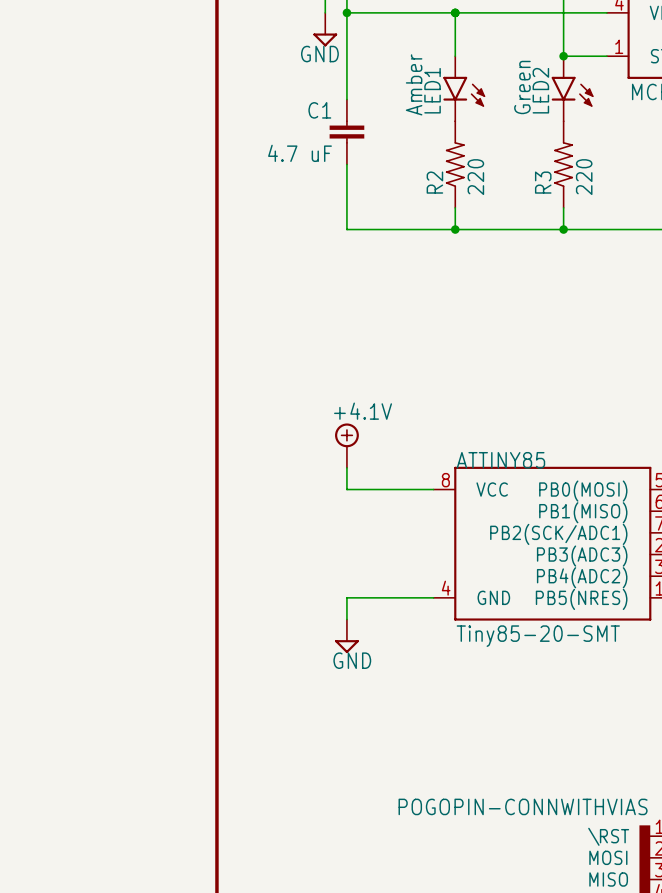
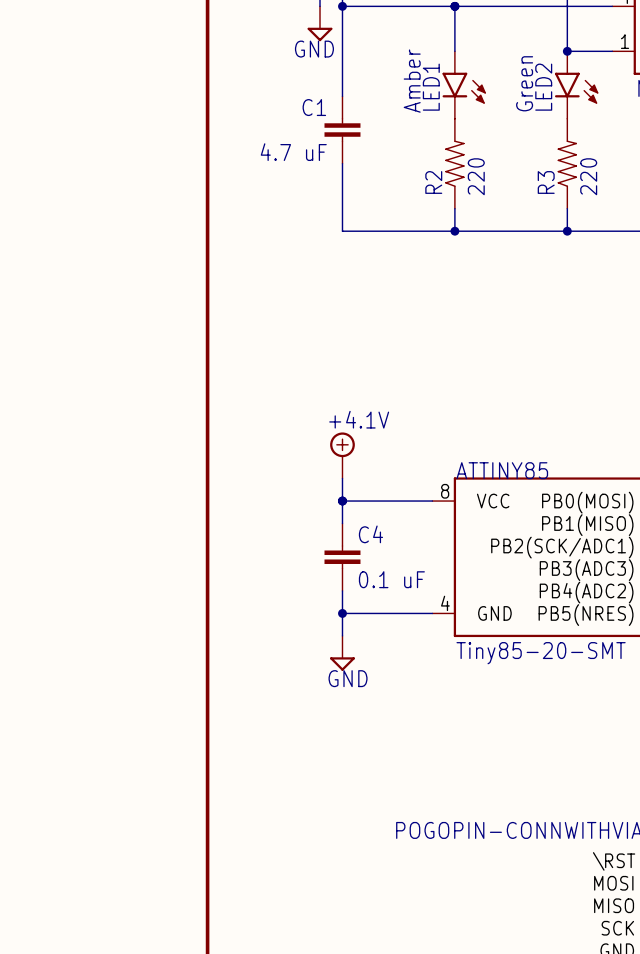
wire: none -> (342, 501) (342, 523)
junction: none -> (342, 501)
C4: none -> 0.1 uF (342, 557)
wire: none -> (342, 590) (342, 613)
junction: none -> (342, 613)

